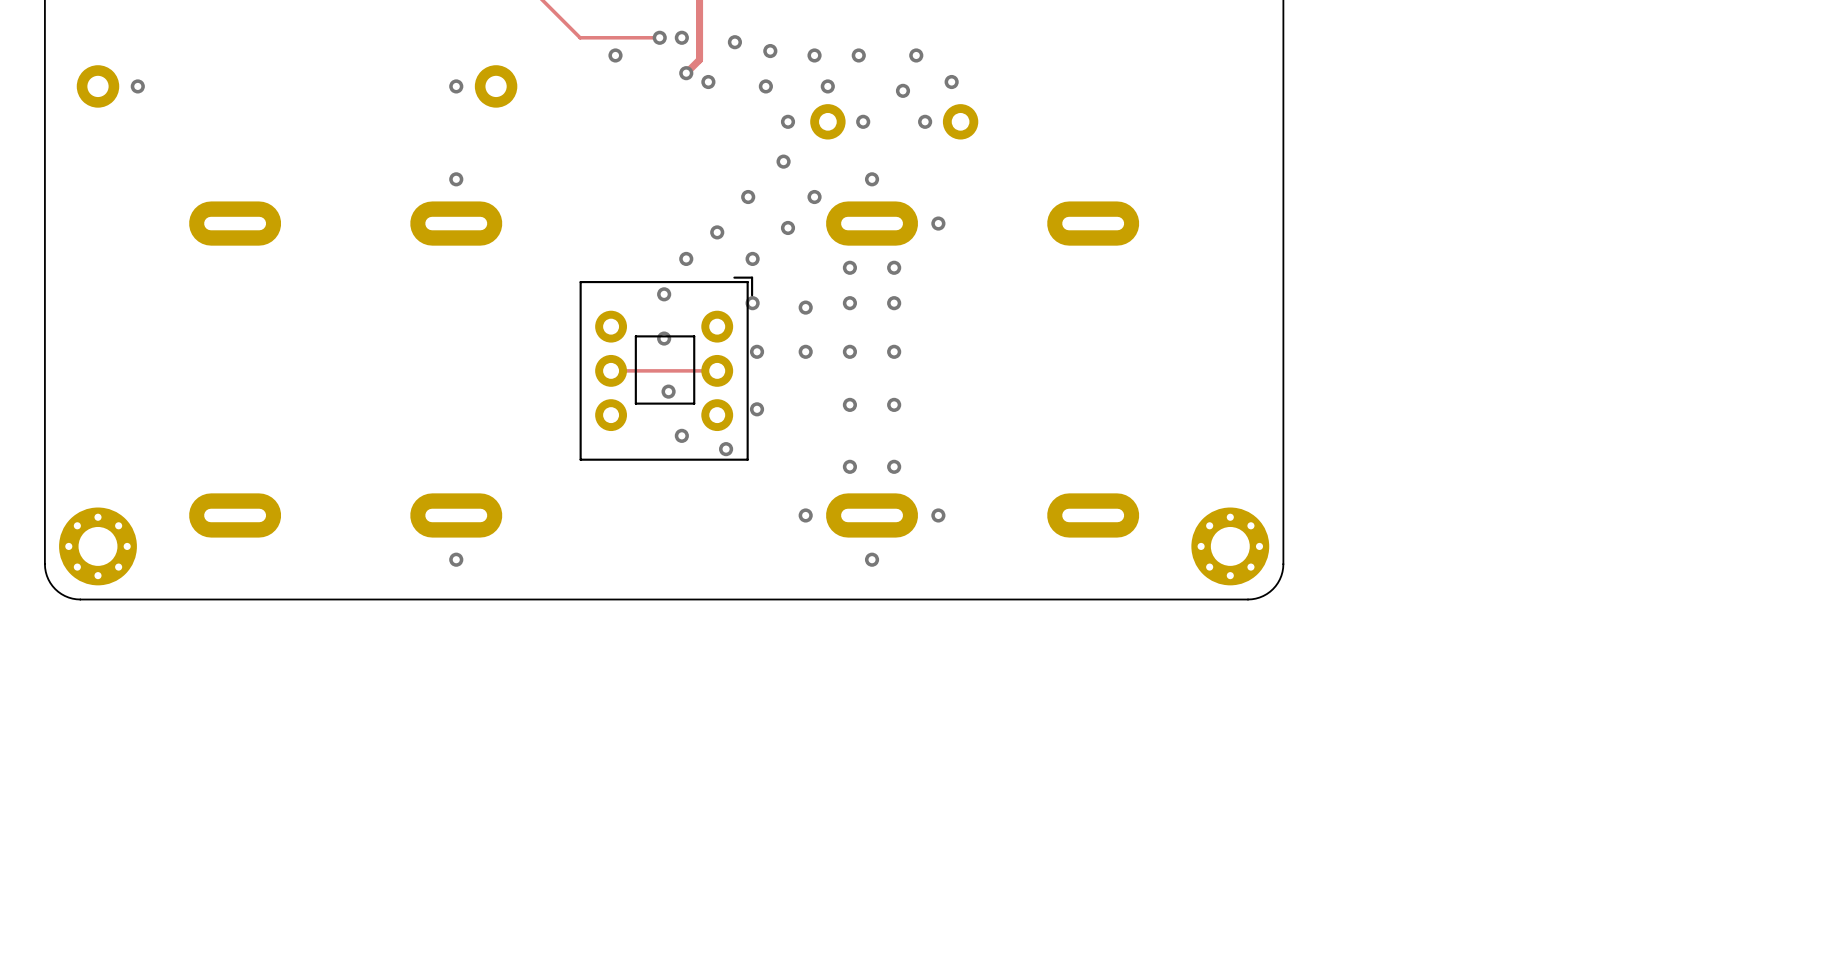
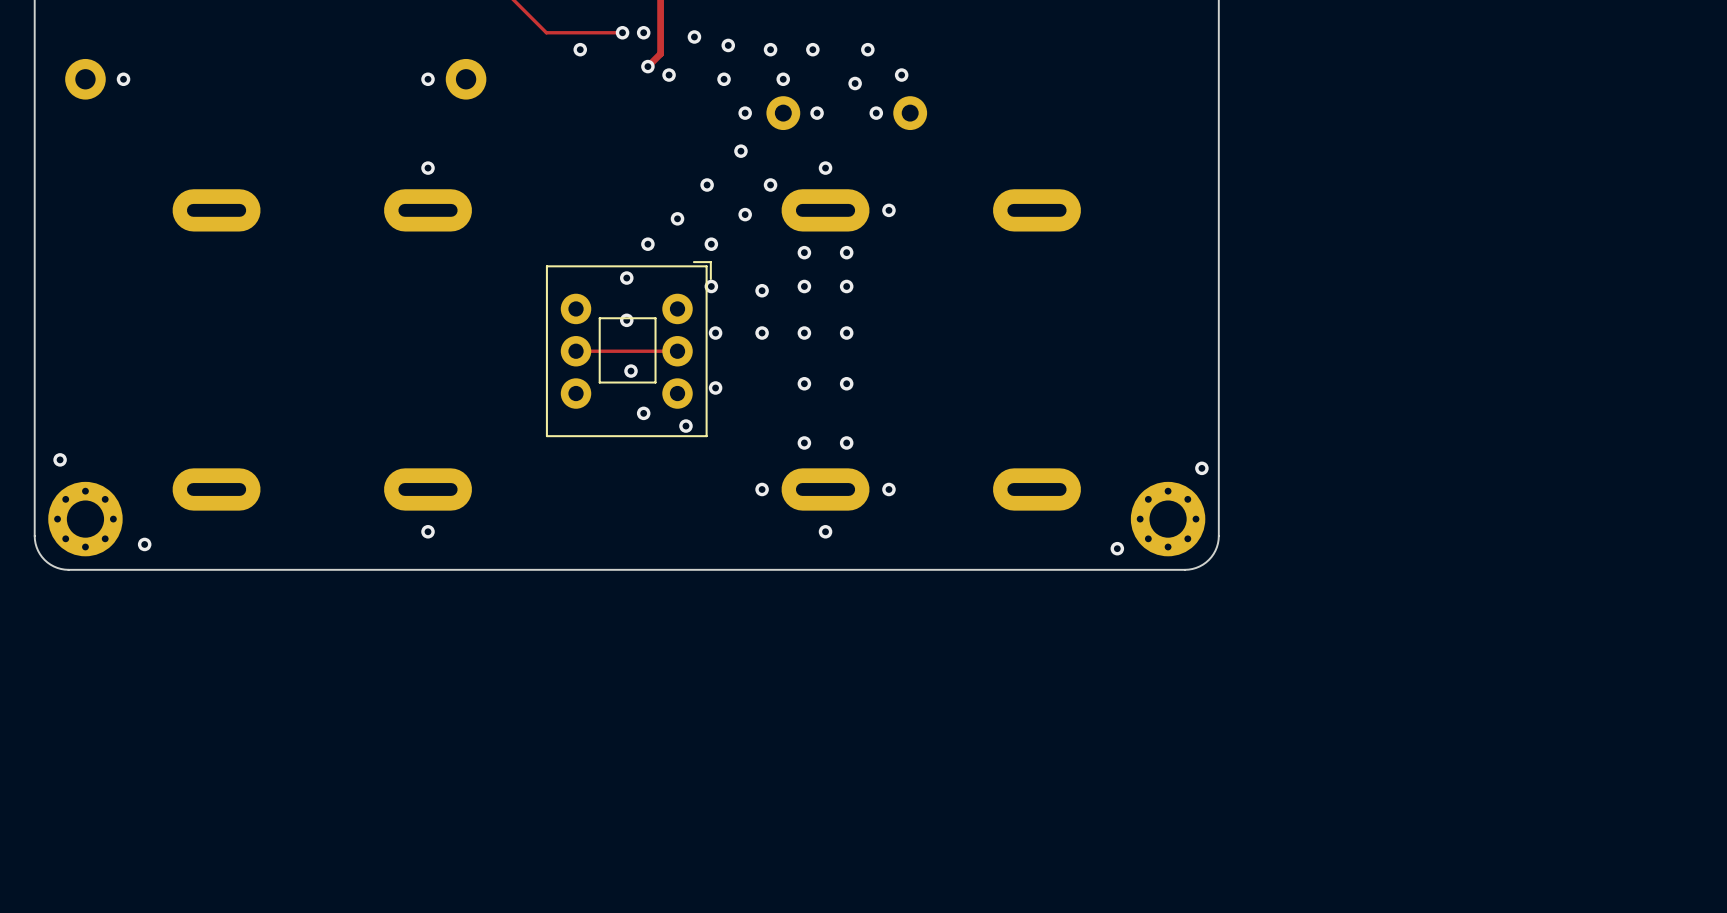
via: none -> (60, 459)
via: none -> (1201, 468)
via: none -> (144, 544)
via: none -> (1117, 548)

